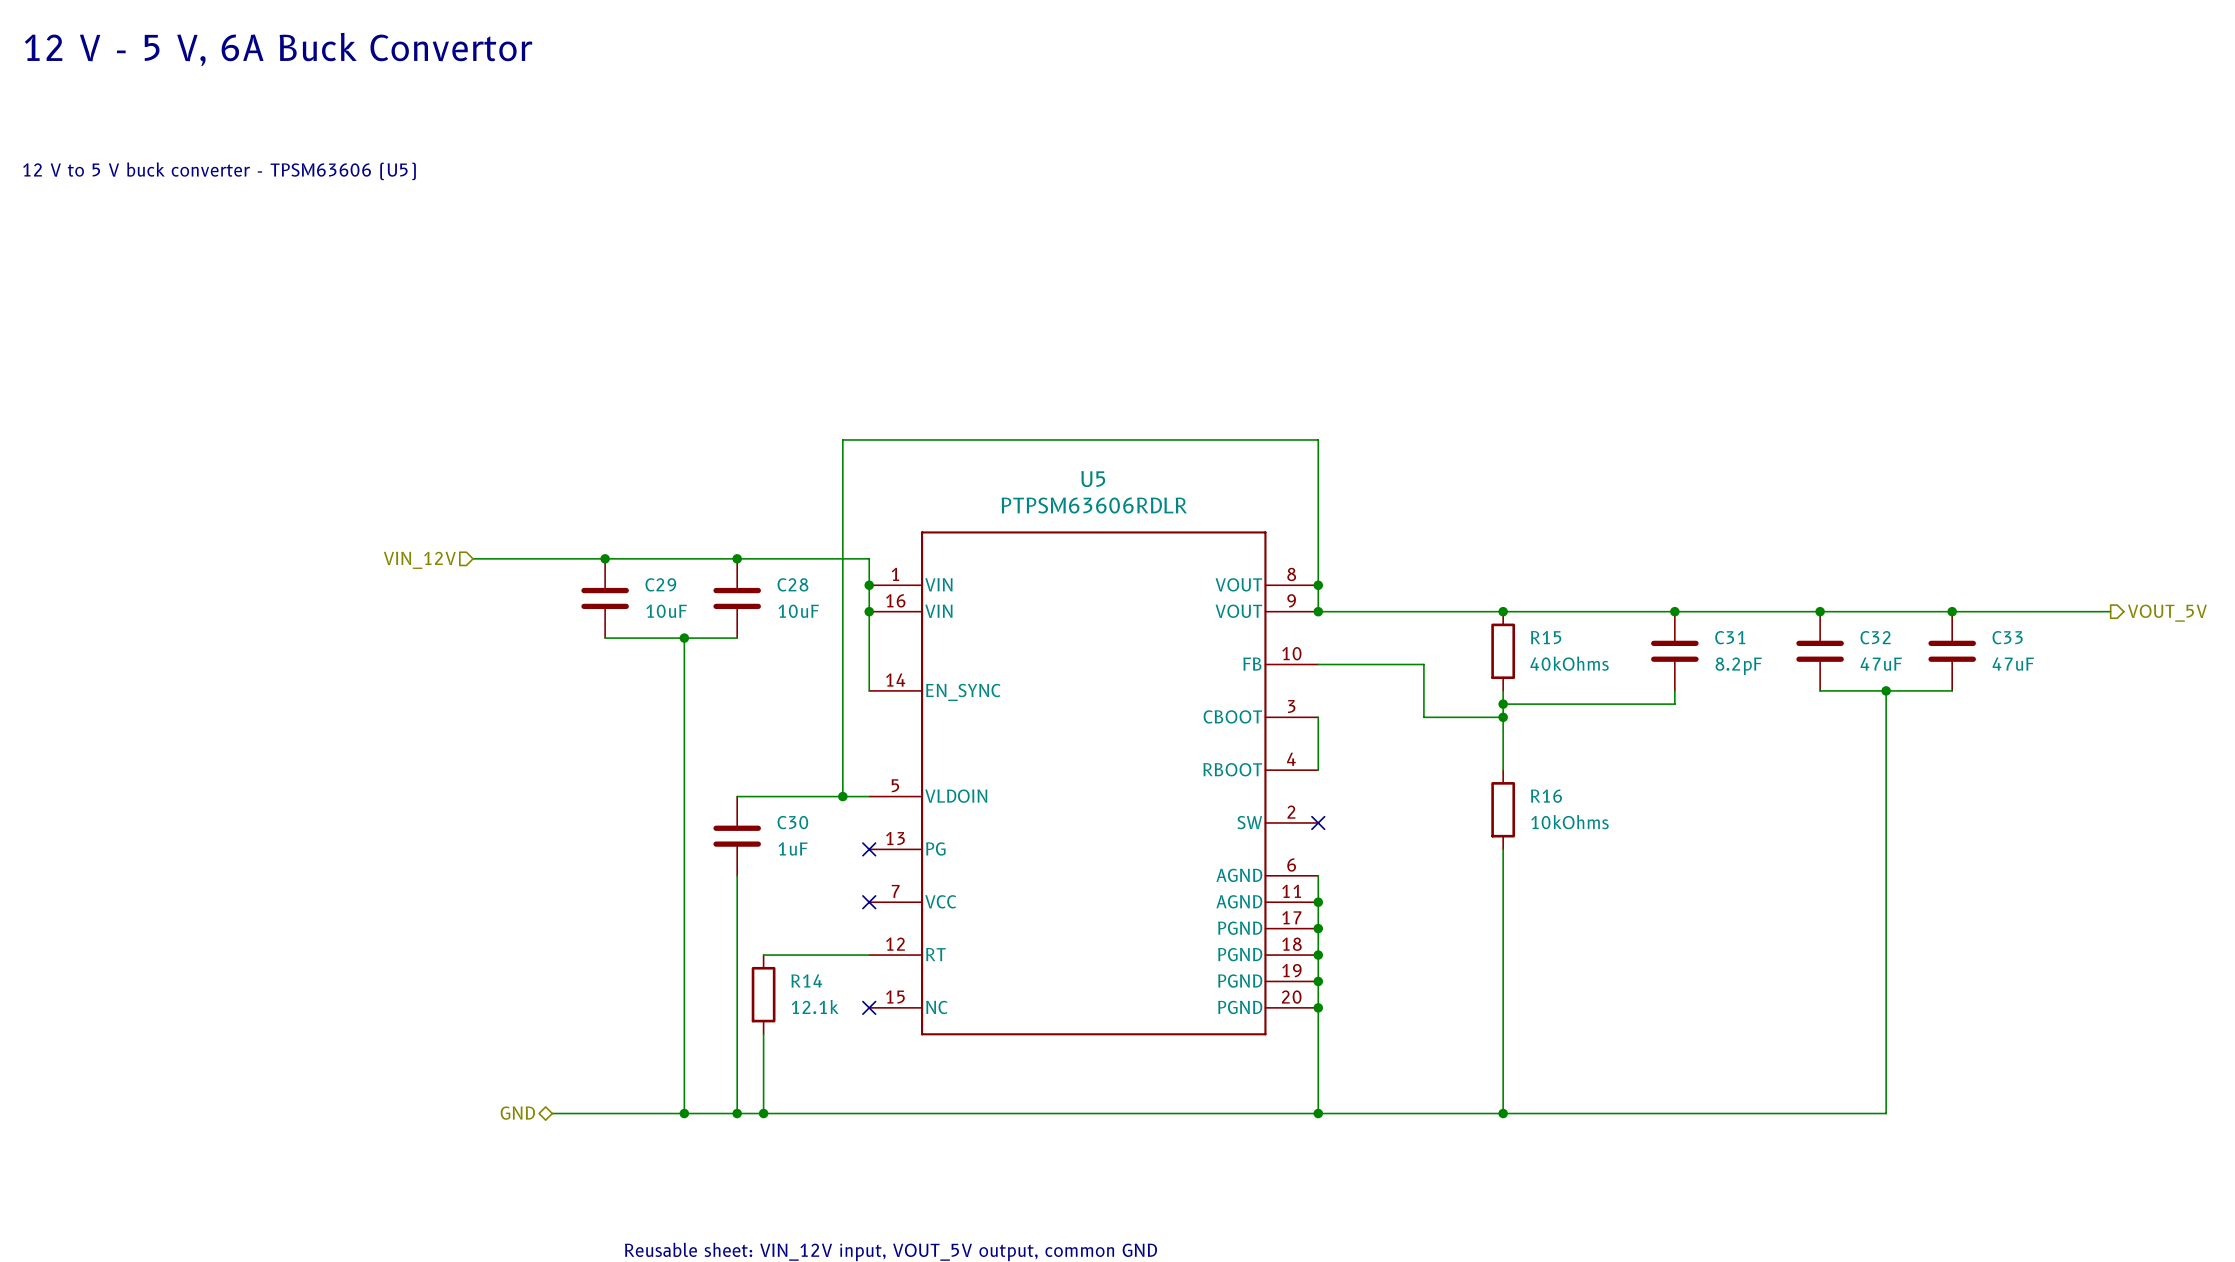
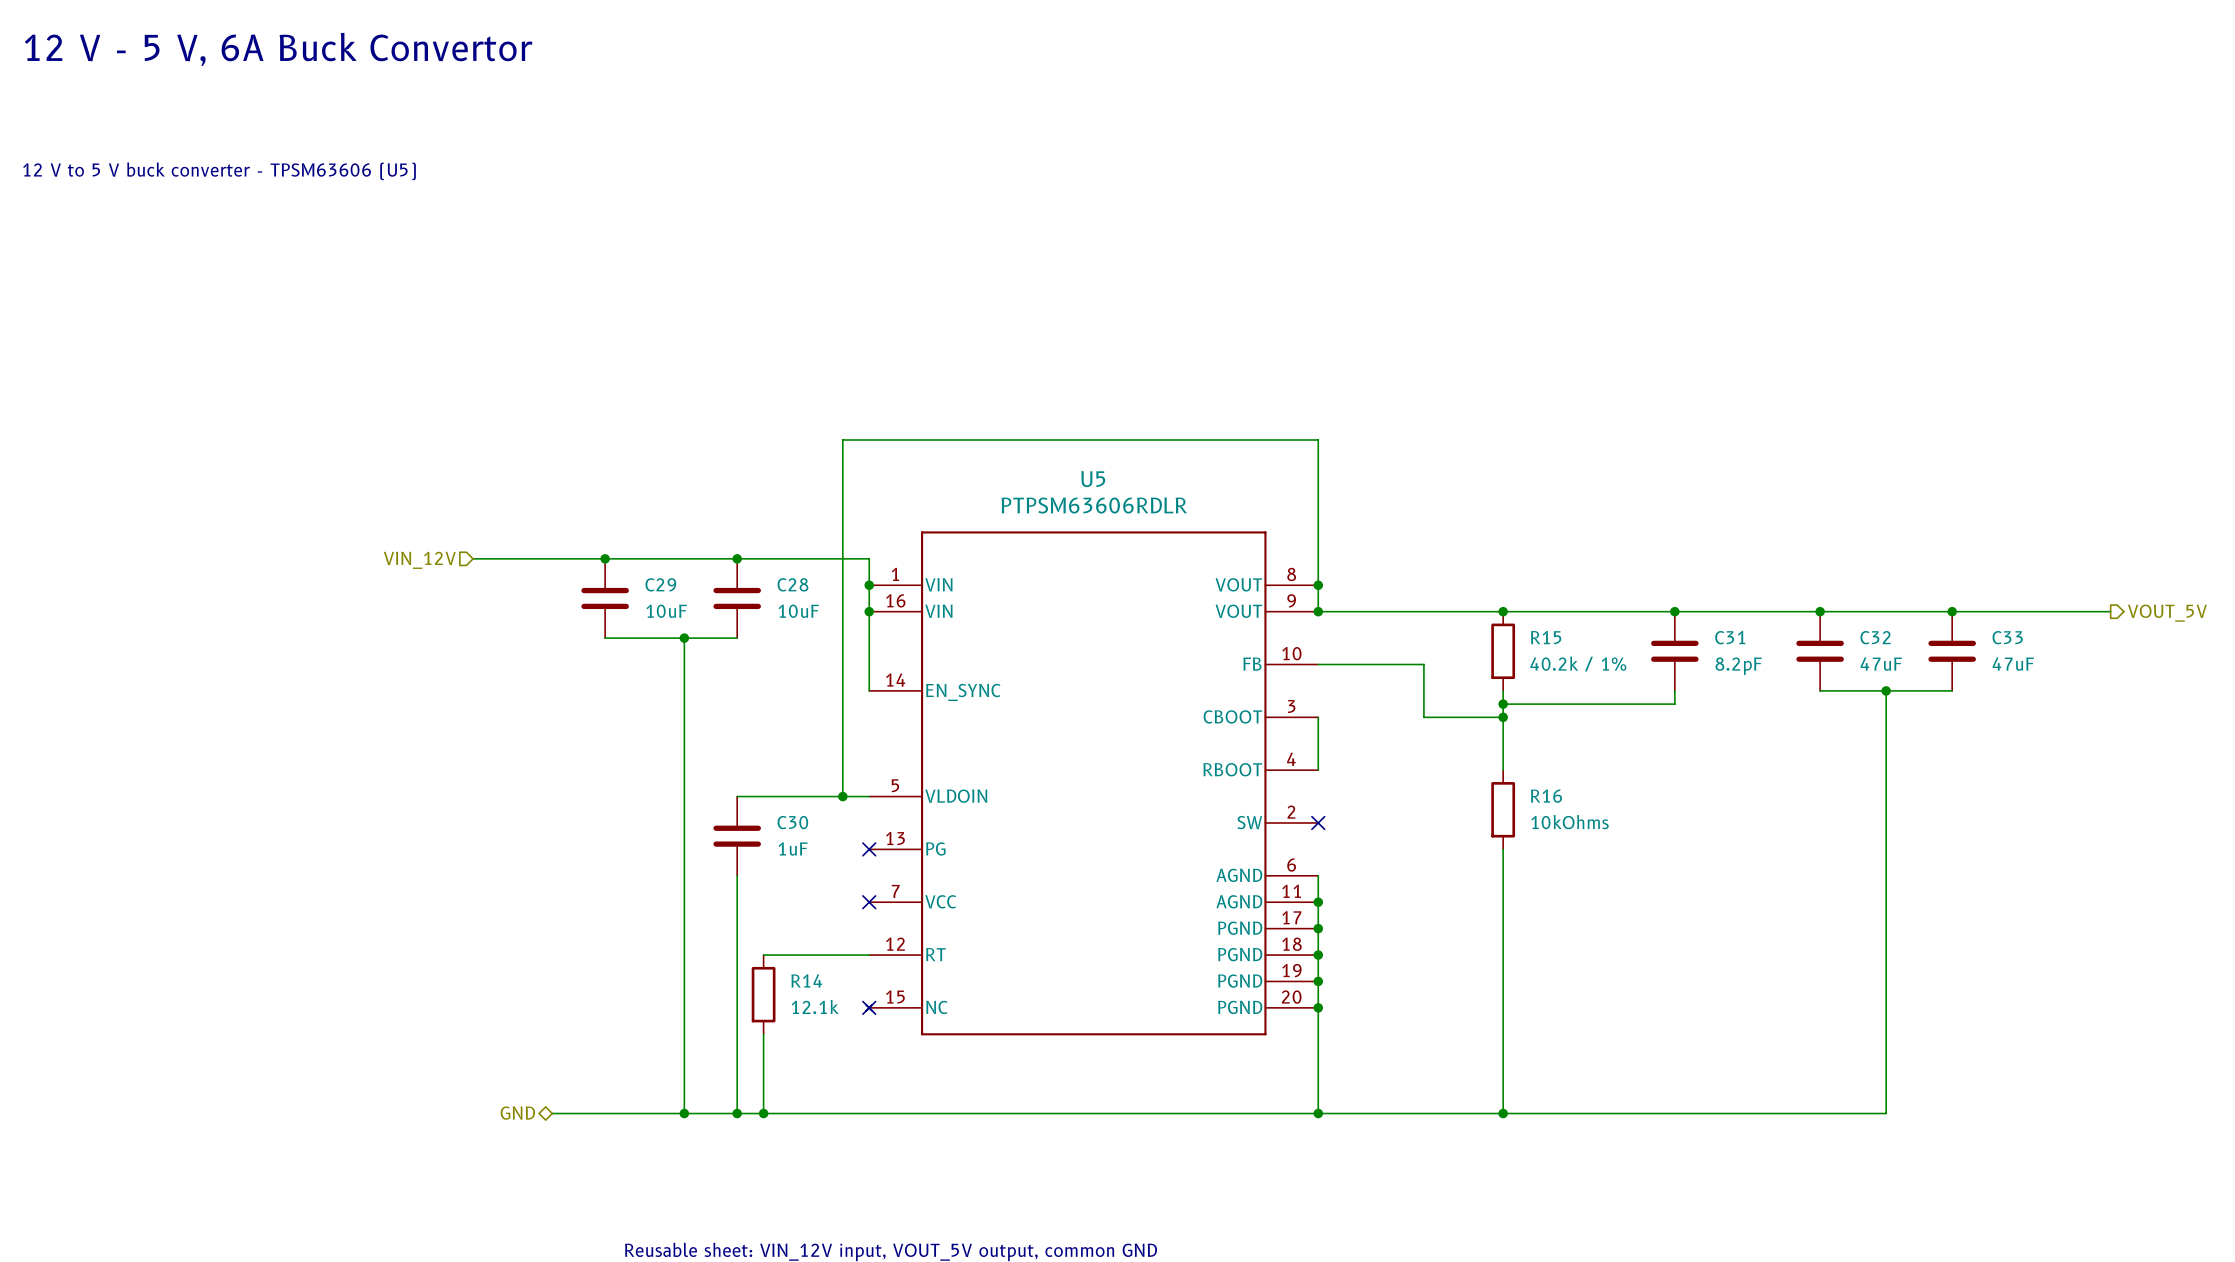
U5 symbol: [869, 531, 1319, 1036] -> [866, 531, 1319, 1036]
R15 value: 40kOhms (1569, 663) -> 40.2k / 1% (1578, 664)

